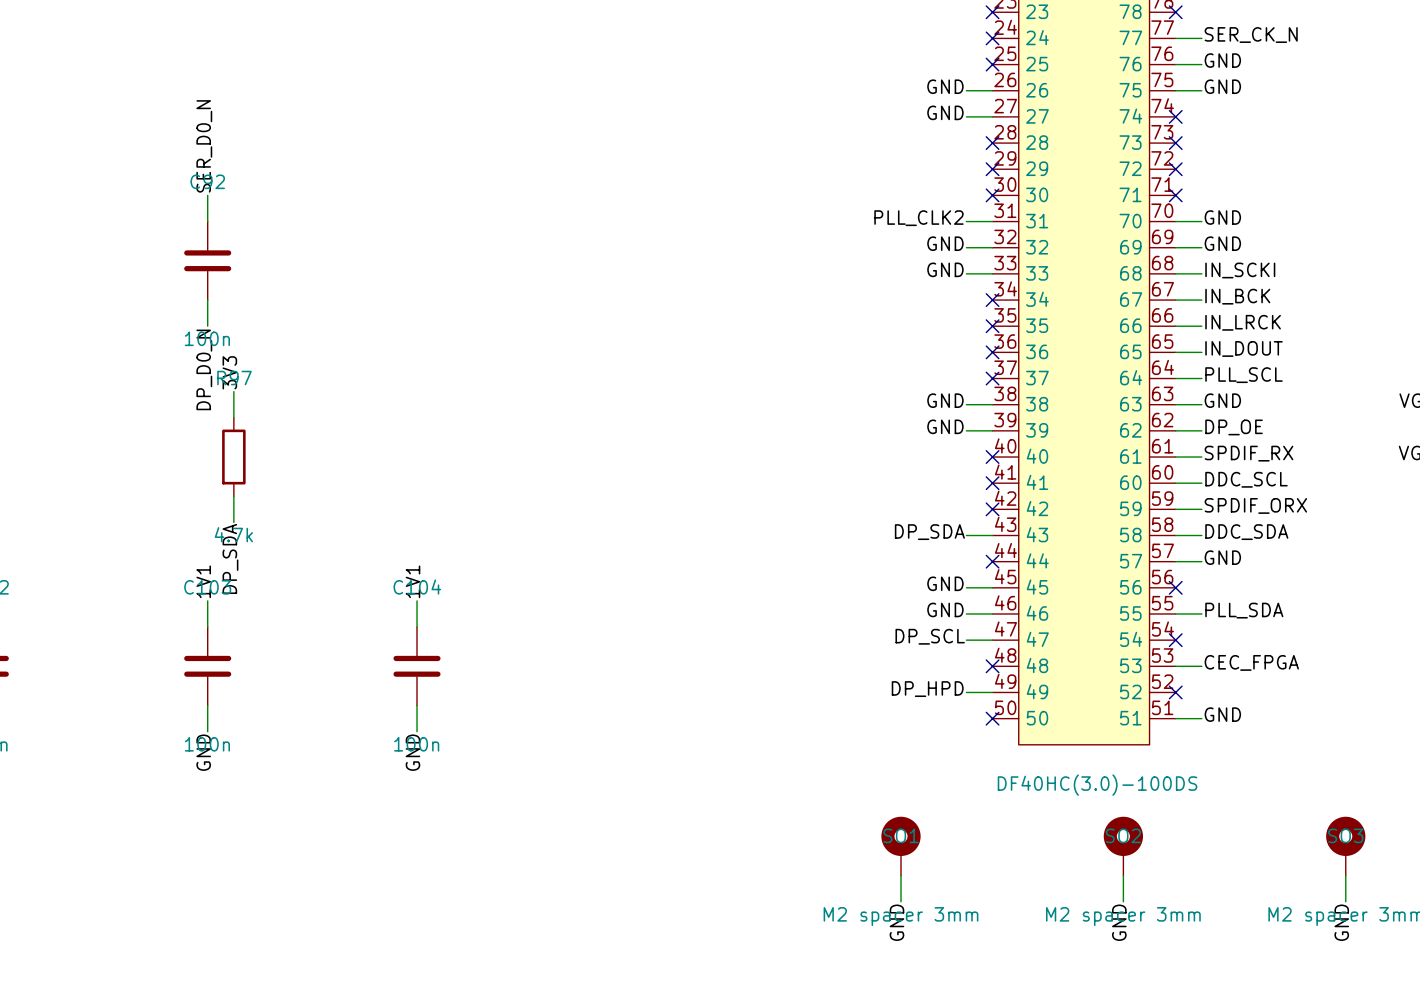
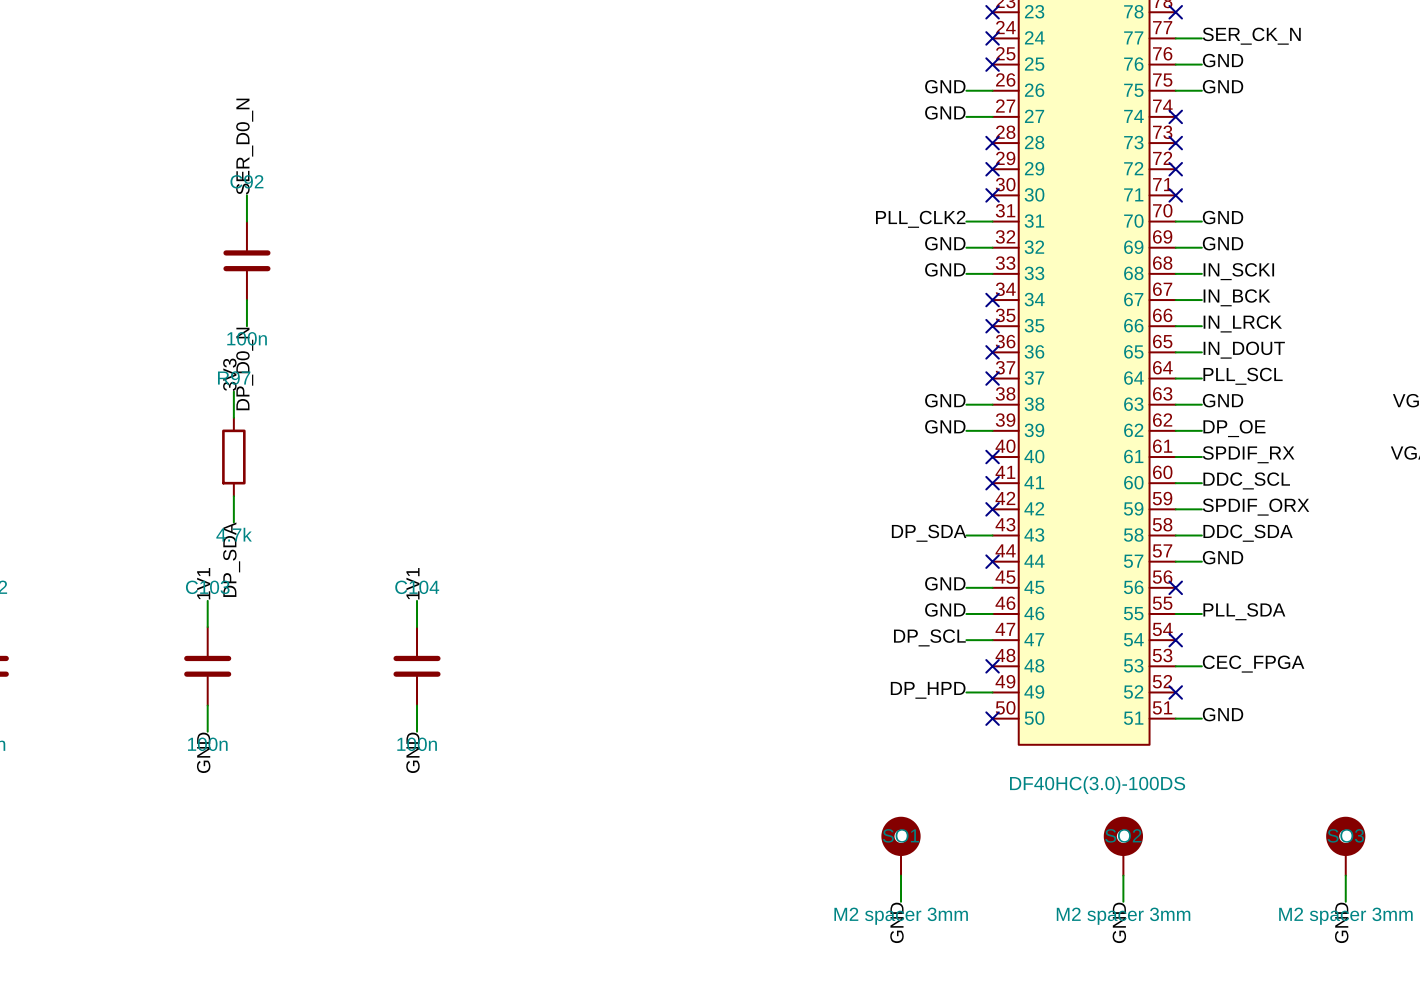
label position: SER_D0_N (204, 146) -> SER_D0_N (244, 146)
wire: (207, 195) (207, 221) -> (246, 195) (246, 221)
C92 position: (207, 260) -> (246, 260)
wire: (207, 300) (207, 326) -> (246, 300) (246, 326)
label position: DP_D0_N (204, 369) -> DP_D0_N (244, 369)

